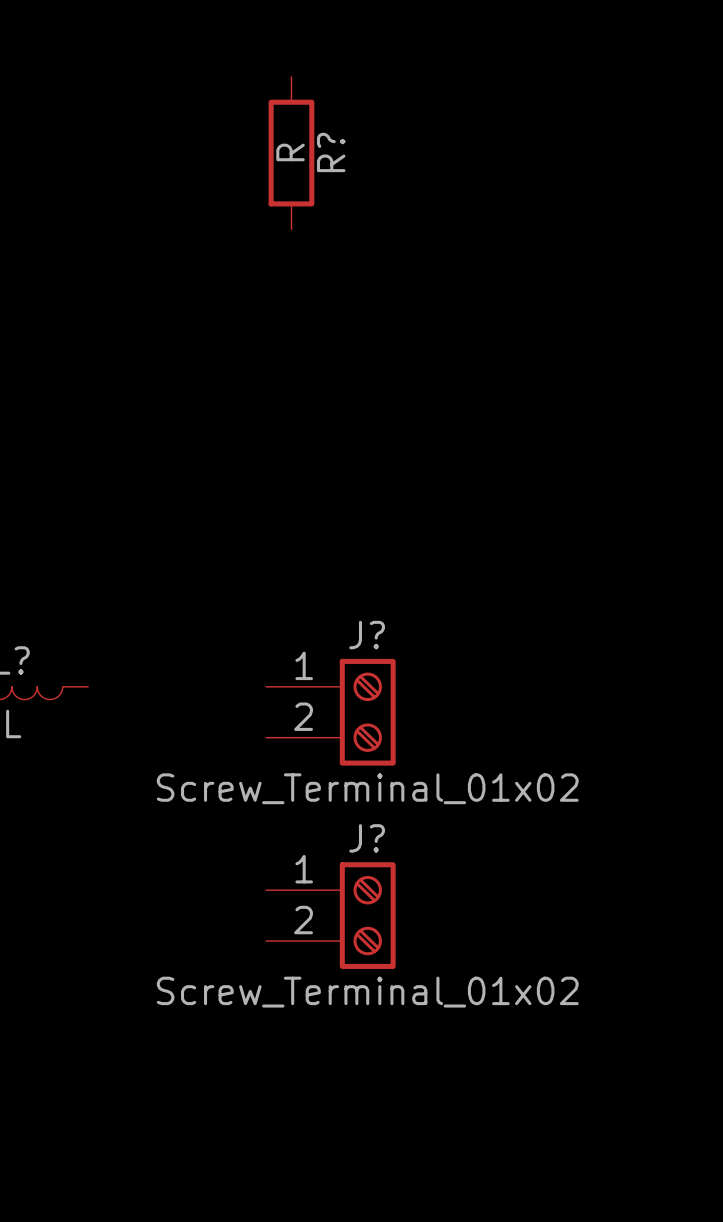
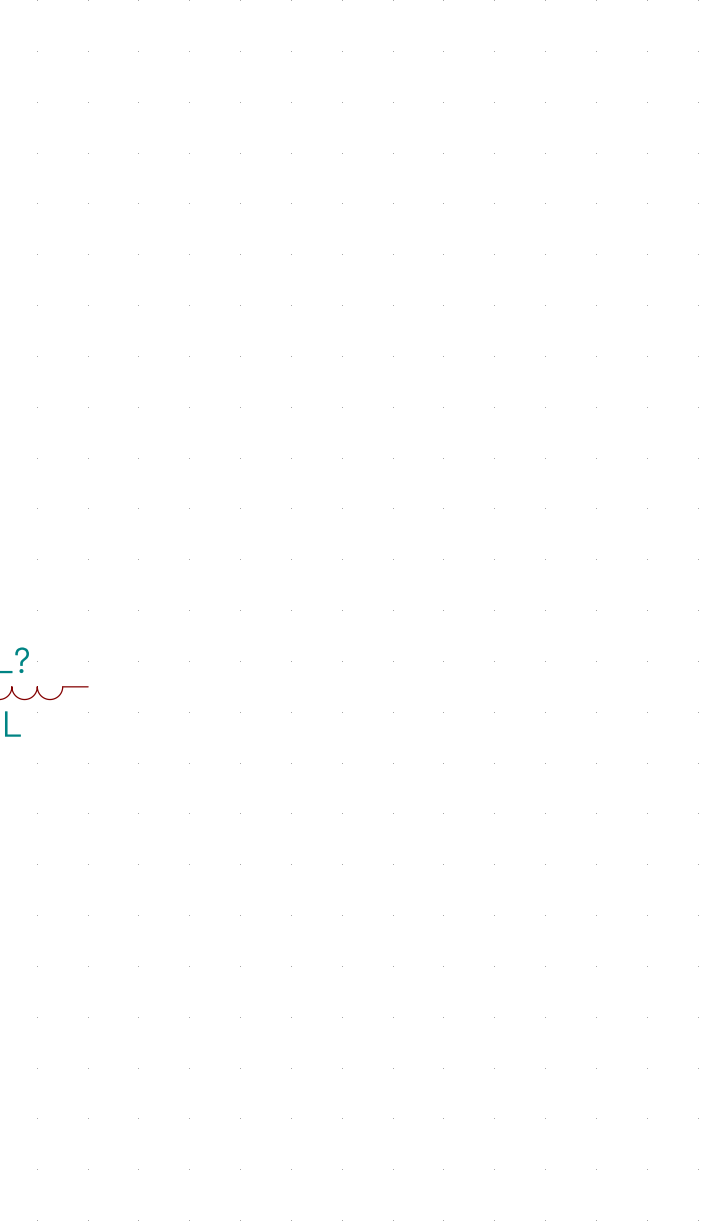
R?: R (291, 153) -> none
J?: Screw_Terminal_01x02 (330, 712) -> none
J?: Screw_Terminal_01x02 (330, 915) -> none

